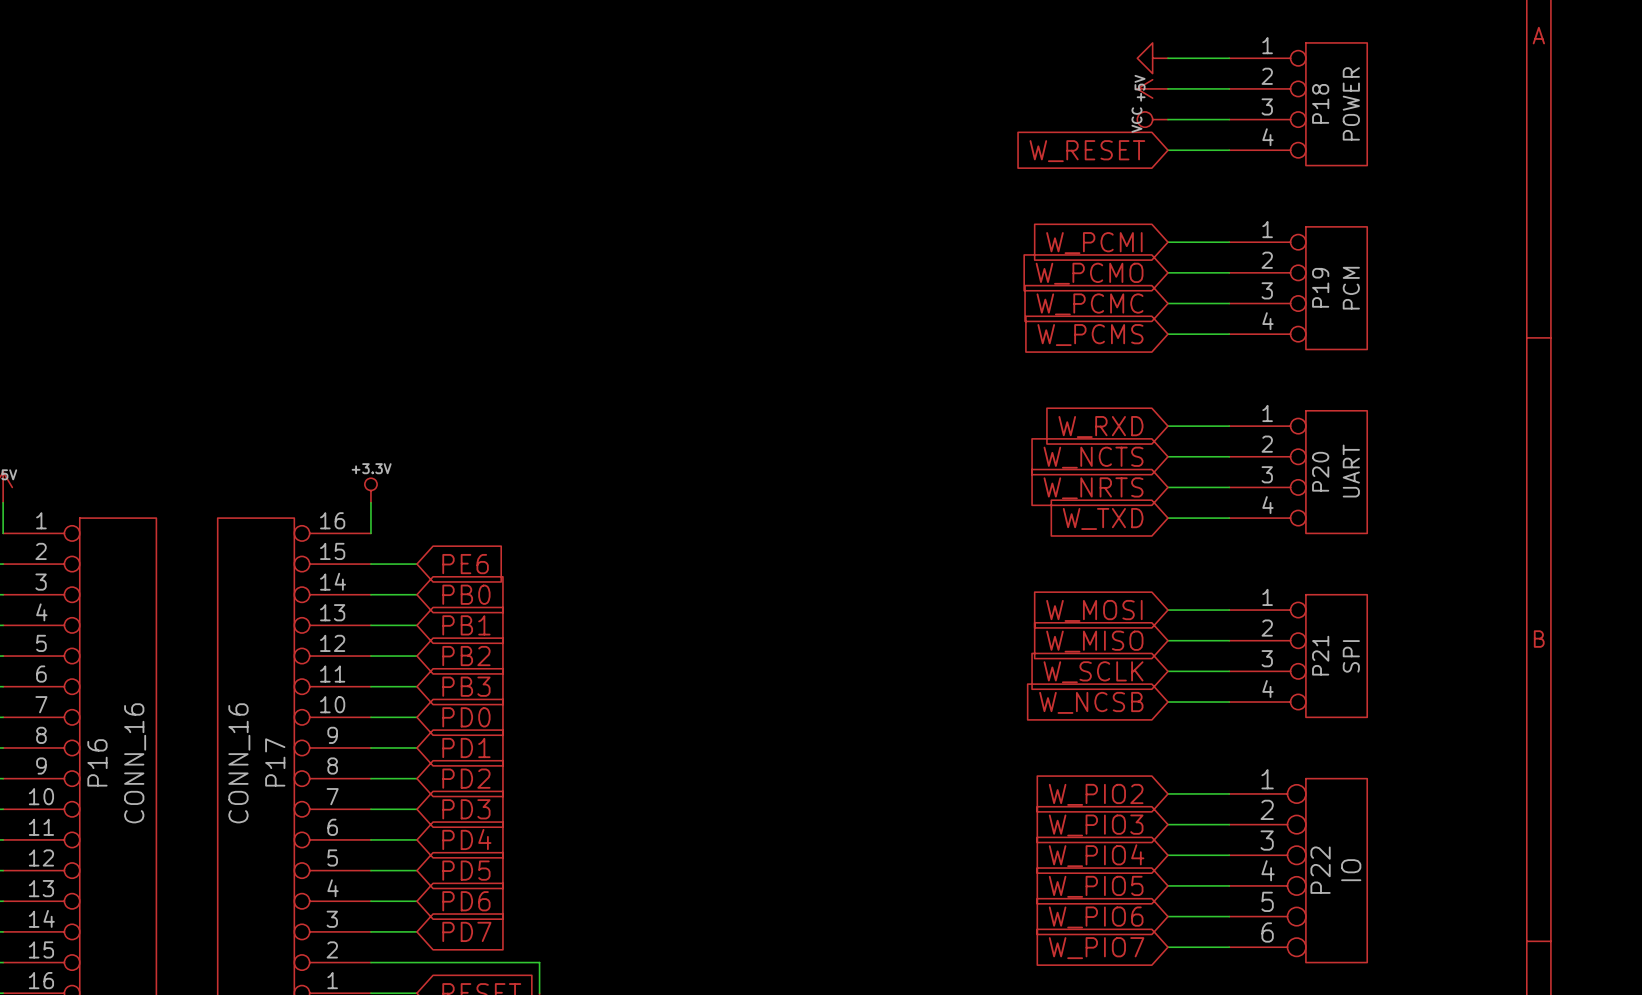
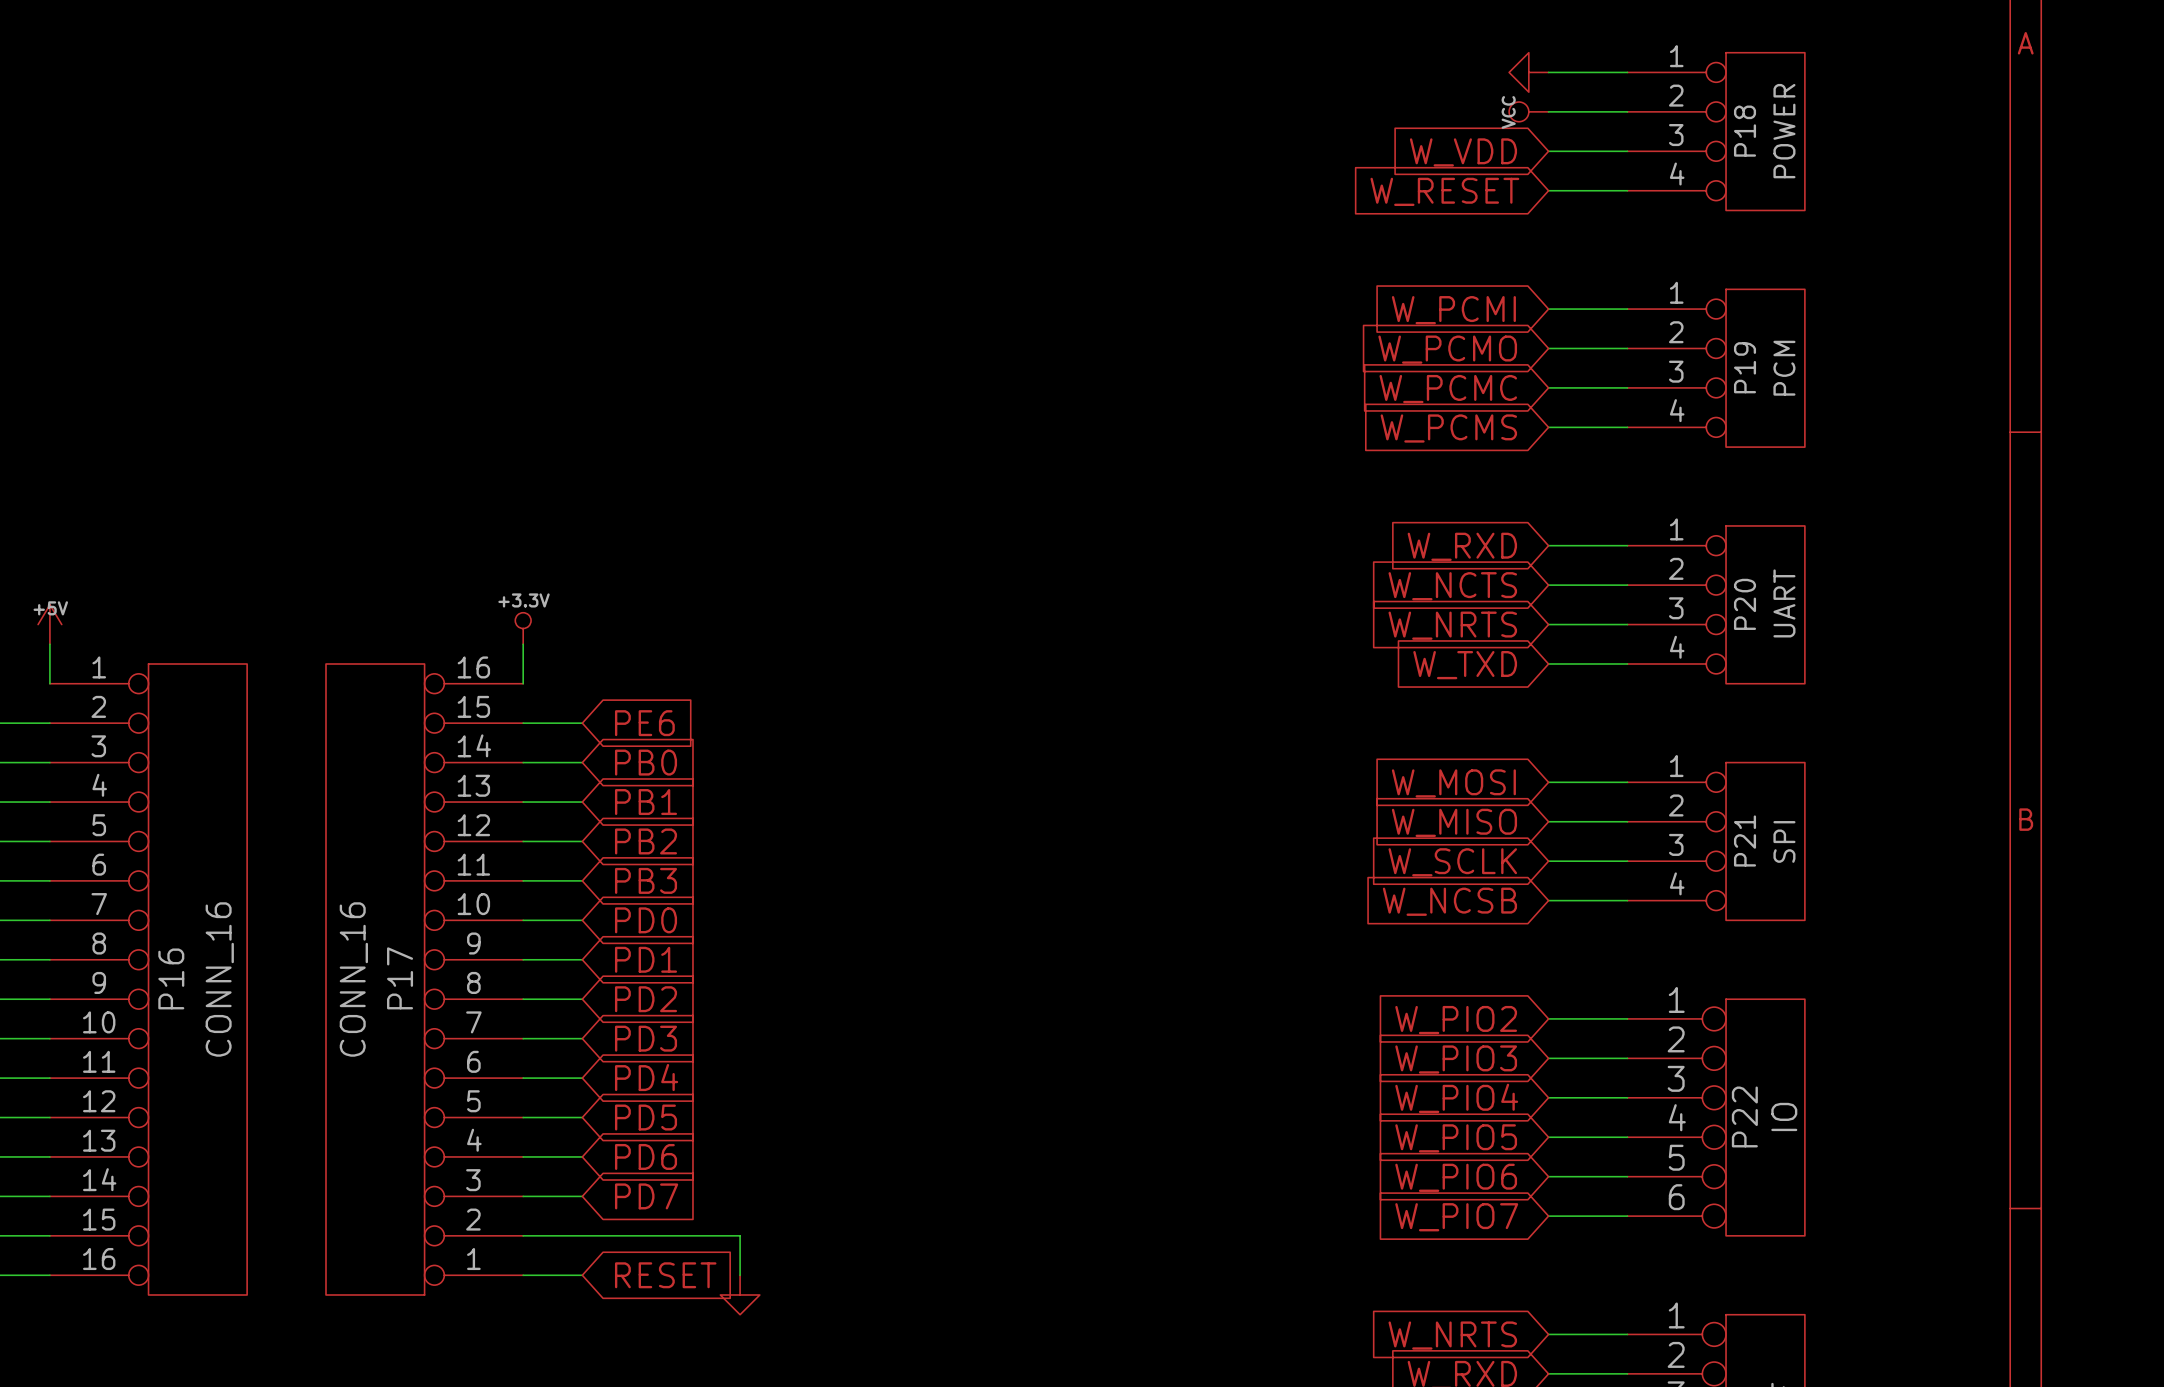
power symbol: +5V (1152, 88) -> VCC (1528, 111)
power symbol: VCC (1152, 119) -> none
global label: none -> W_VDD (1463, 152)

